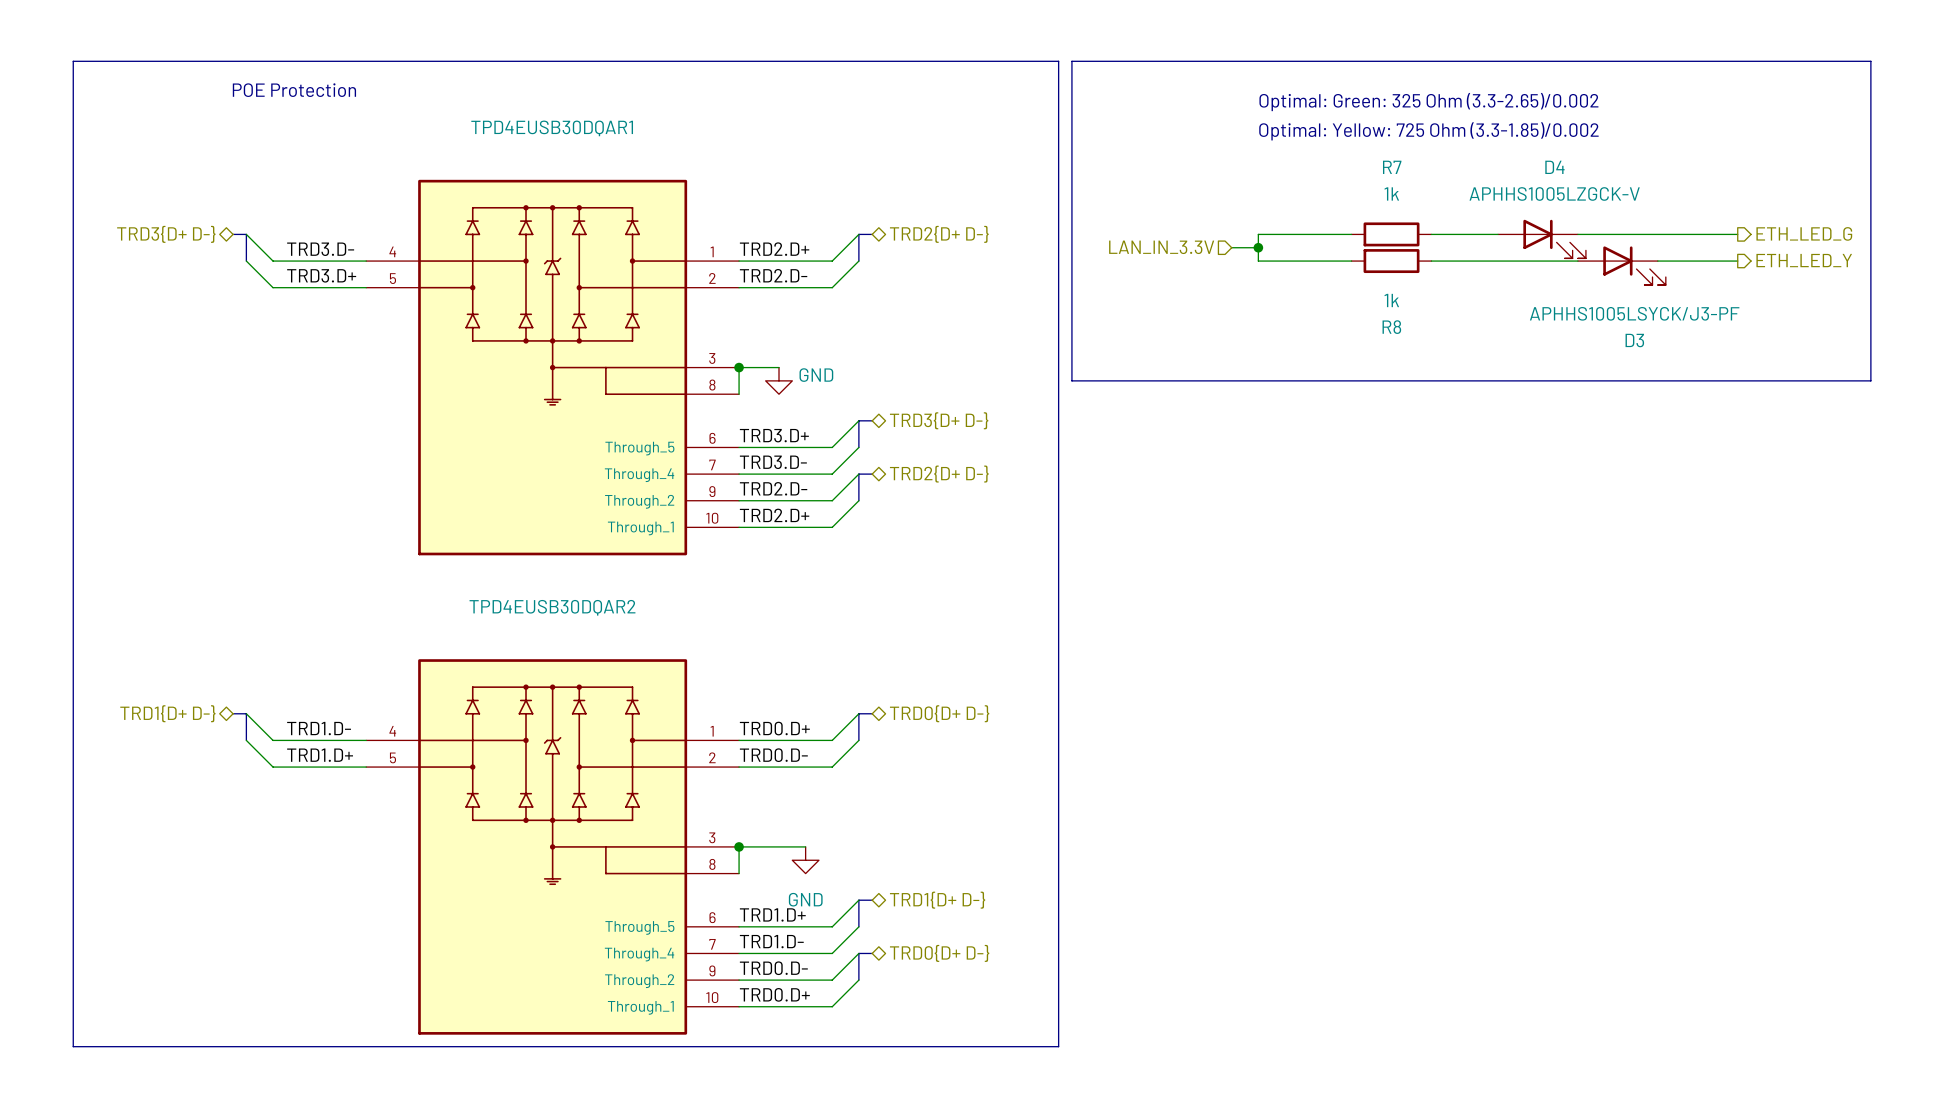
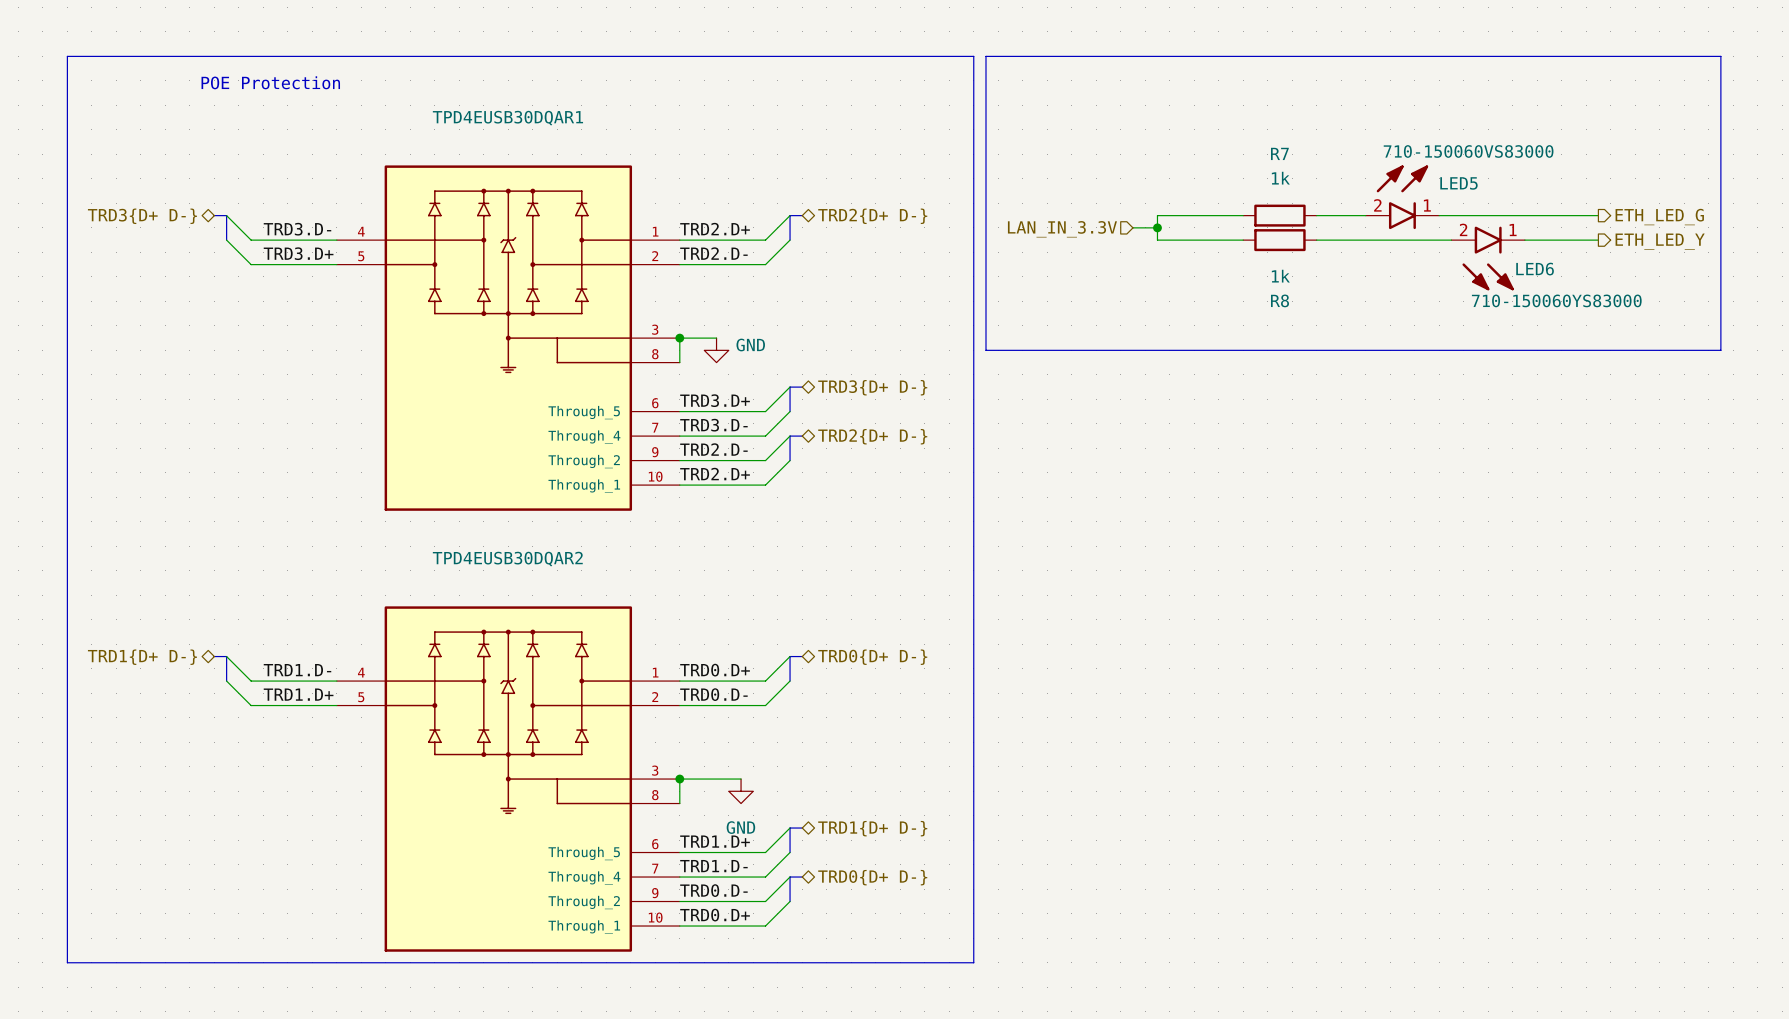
text: Optimal: Green: 325 Ohm (3.3-2.65)/0.002 (1428, 102) -> none
text: Optimal: Yellow: 725 Ohm (3.3-1.85)/0.002 (1428, 131) -> none
LED5: none -> 710-150060VS83000 (1402, 197)
D4: APHHS1005LZGCK-V (1541, 239) -> none
D3: APHHS1005LSYCK/J3-PF (1621, 265) -> none
LED6: none -> 710-150060YS83000 (1488, 258)

